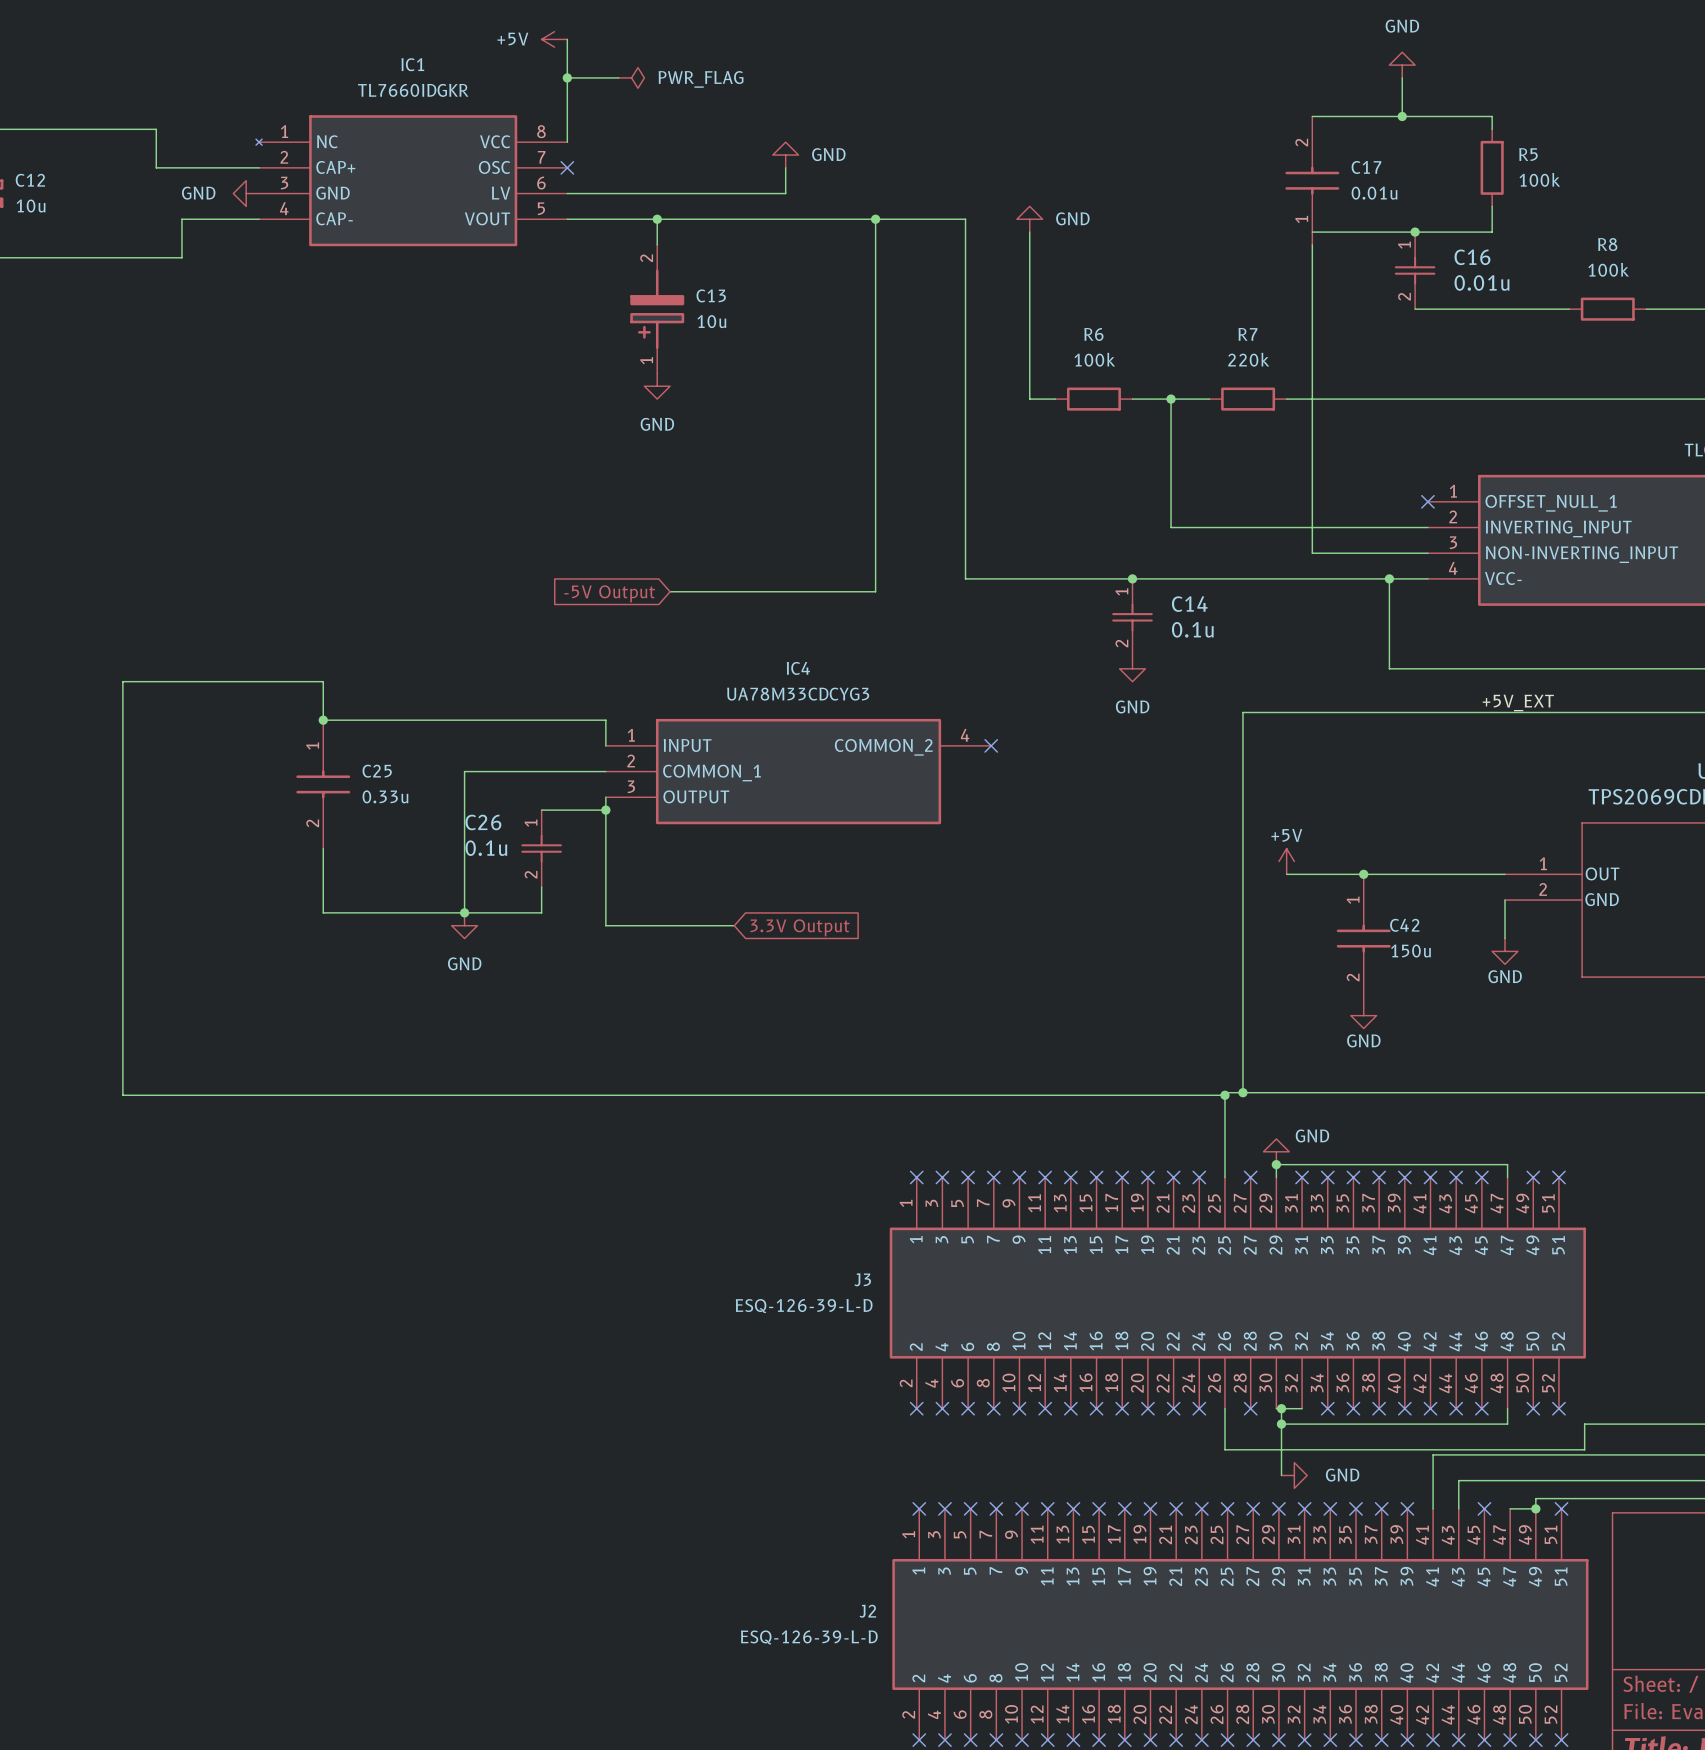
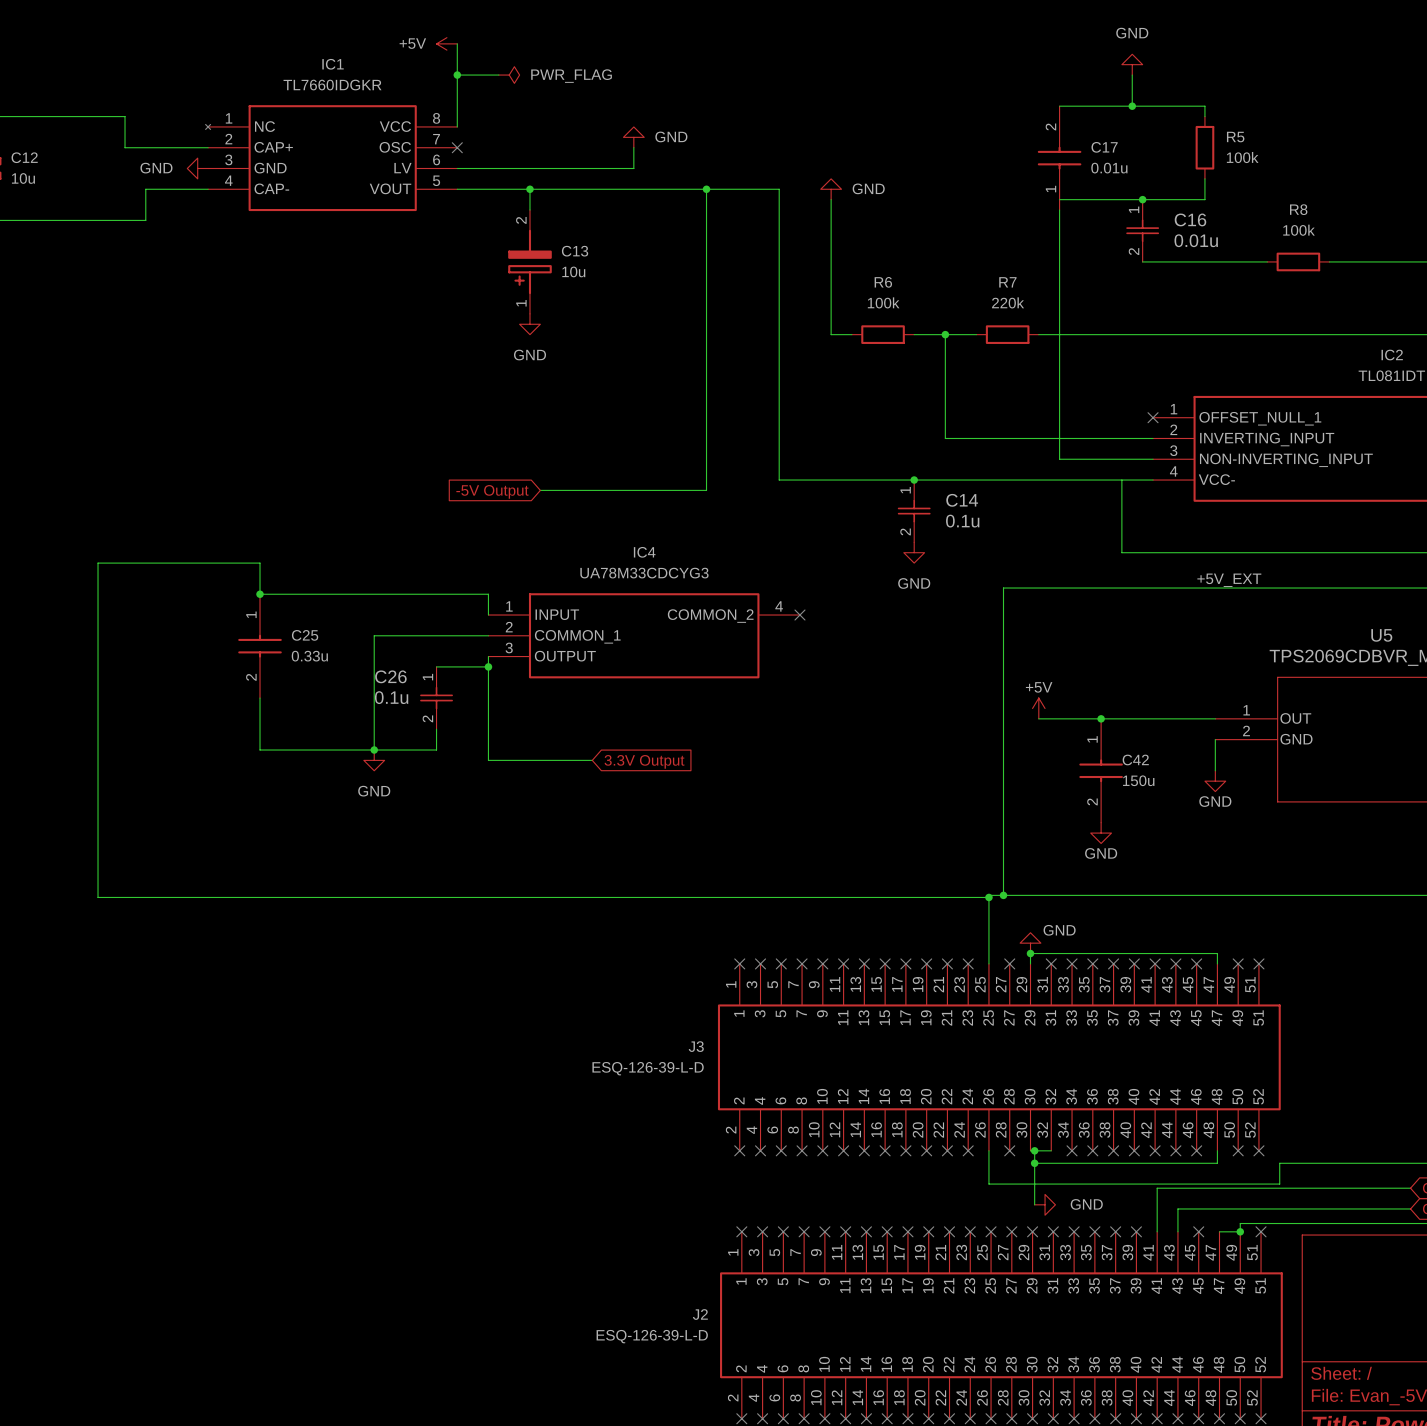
junction: (1389, 578) -> none

